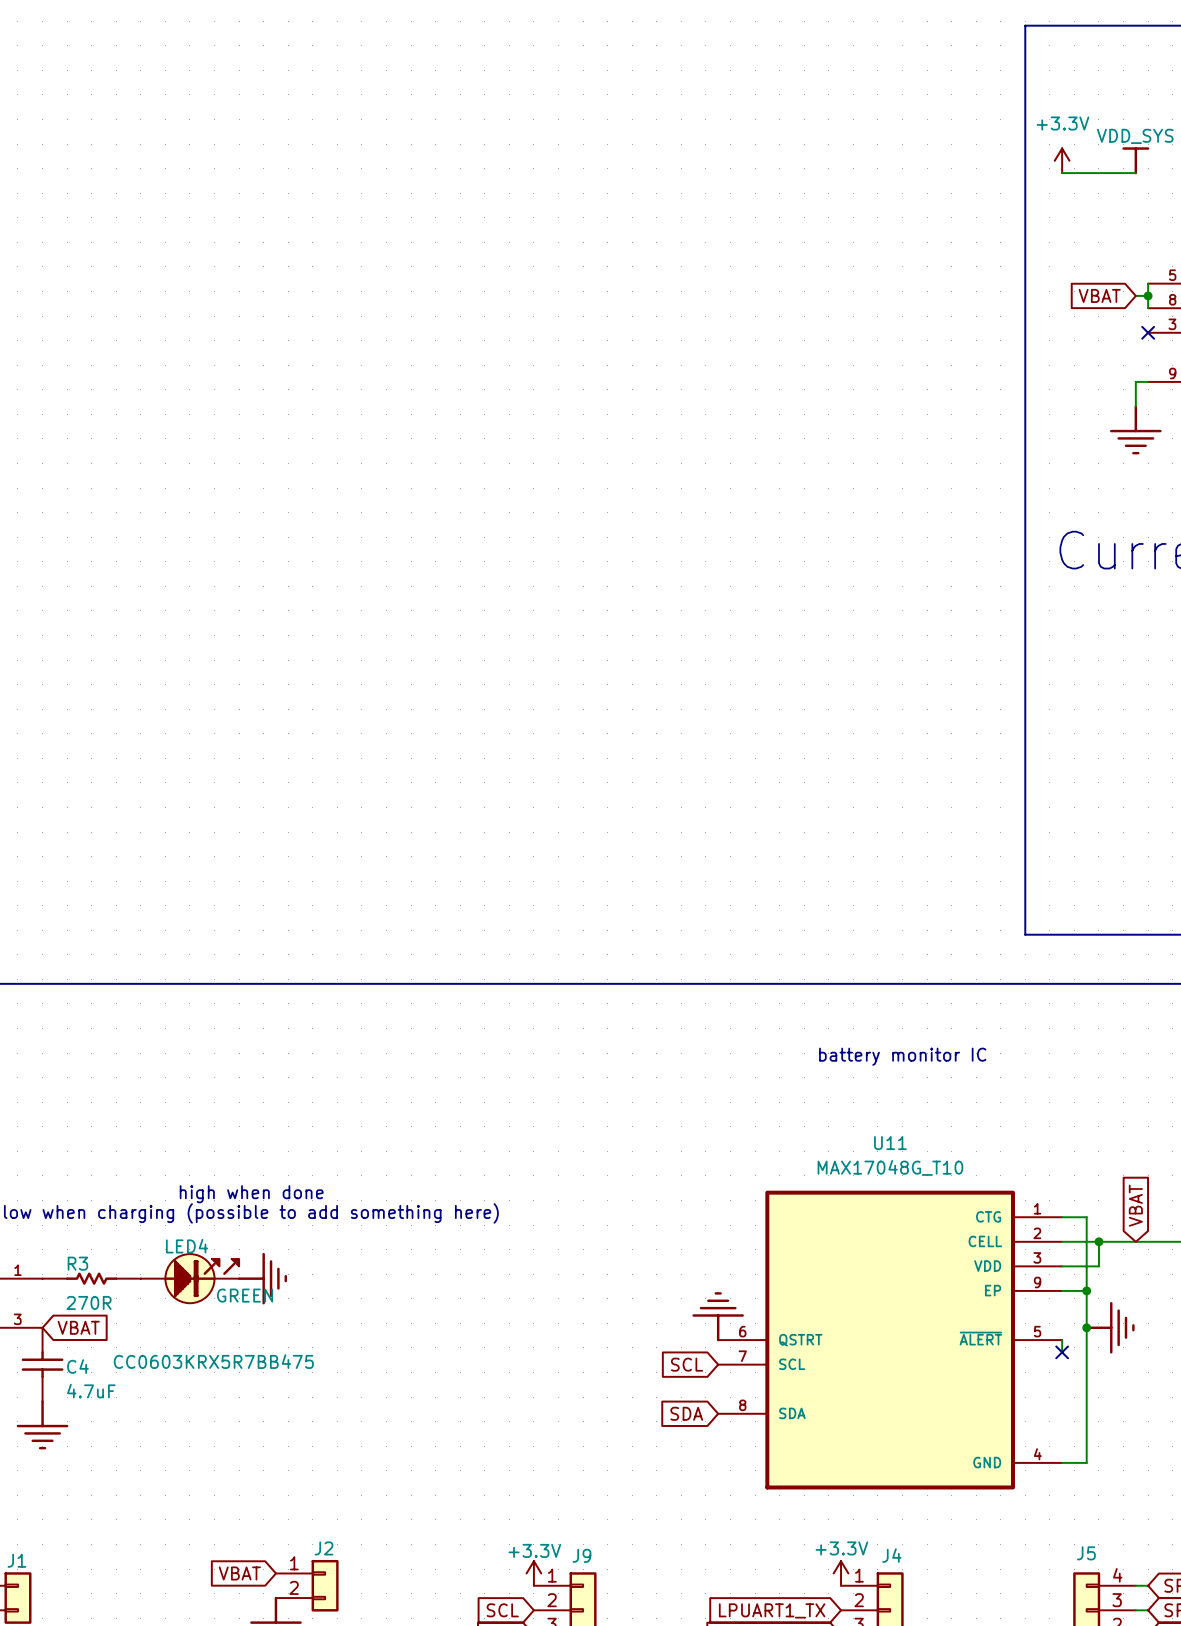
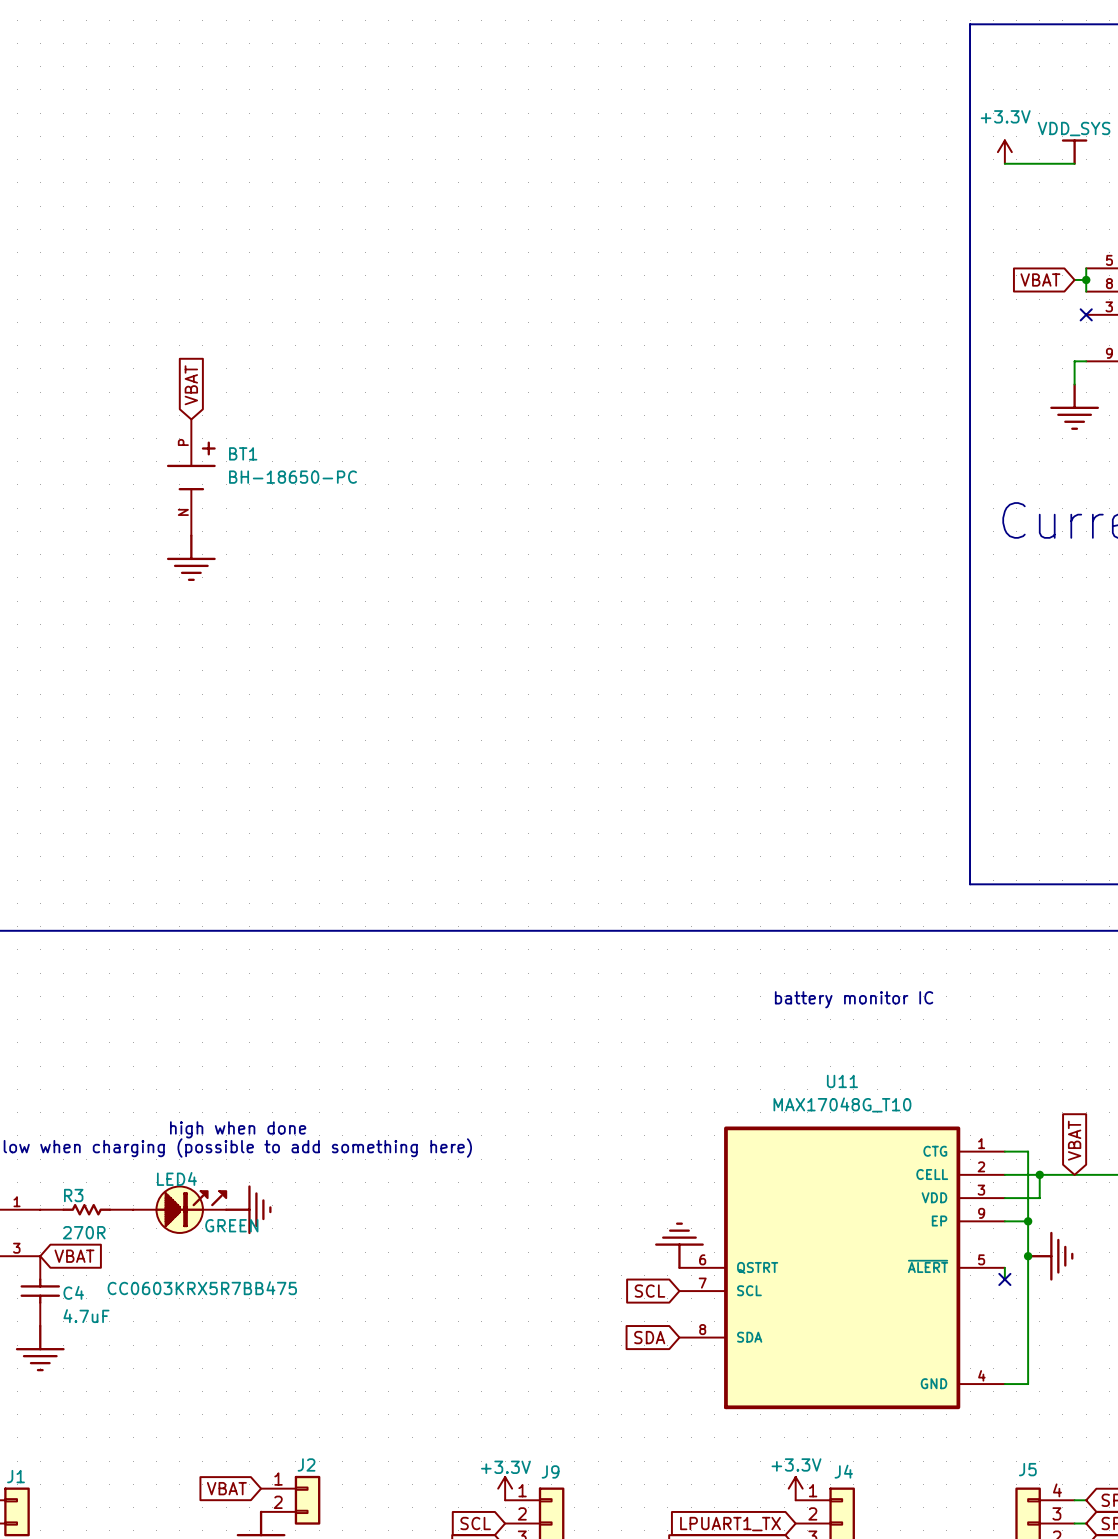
global label: none -> VBAT (191, 385)
BT1: none -> BH-18650-PC (191, 477)
power symbol: none -> (191, 557)

